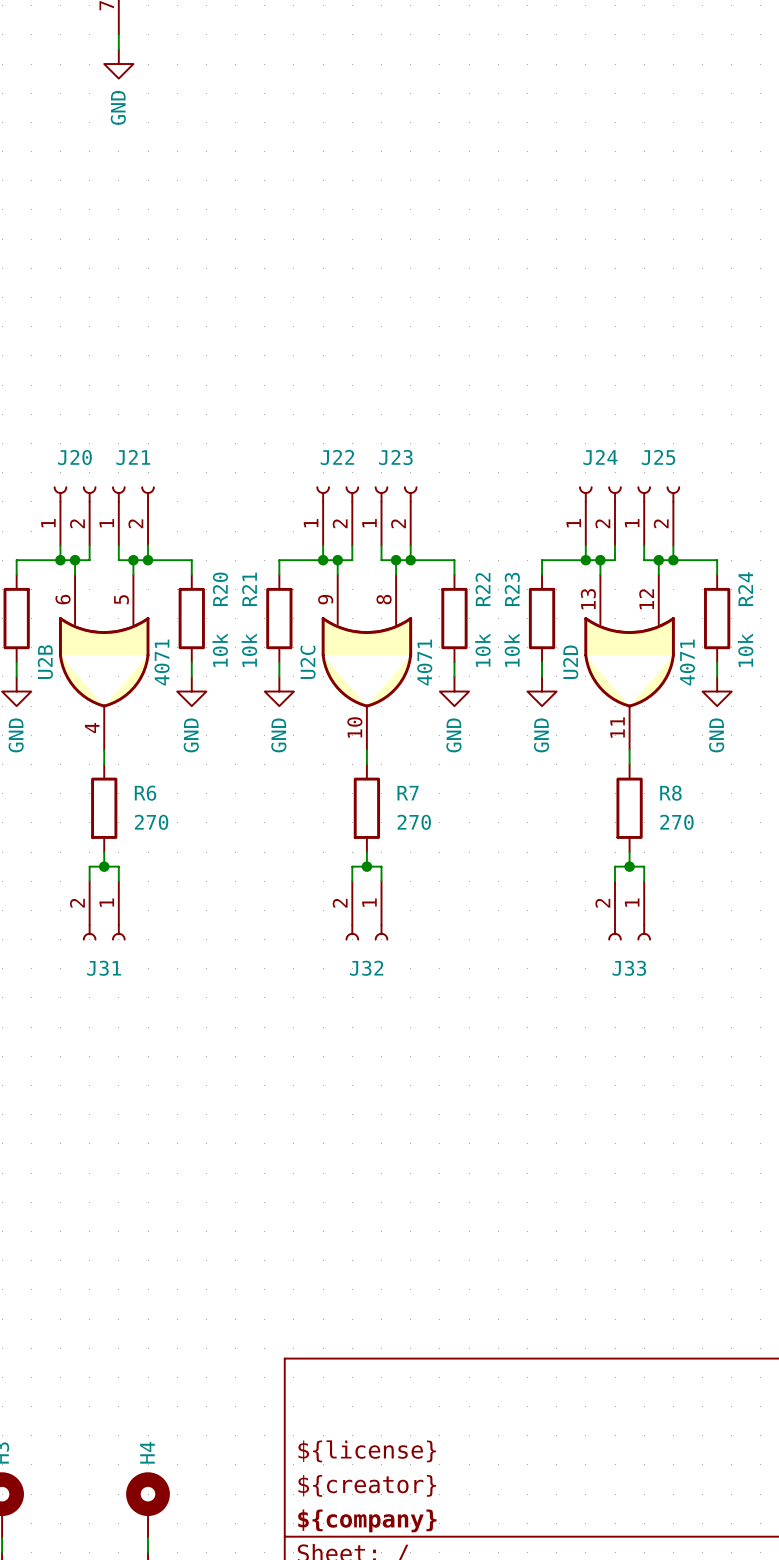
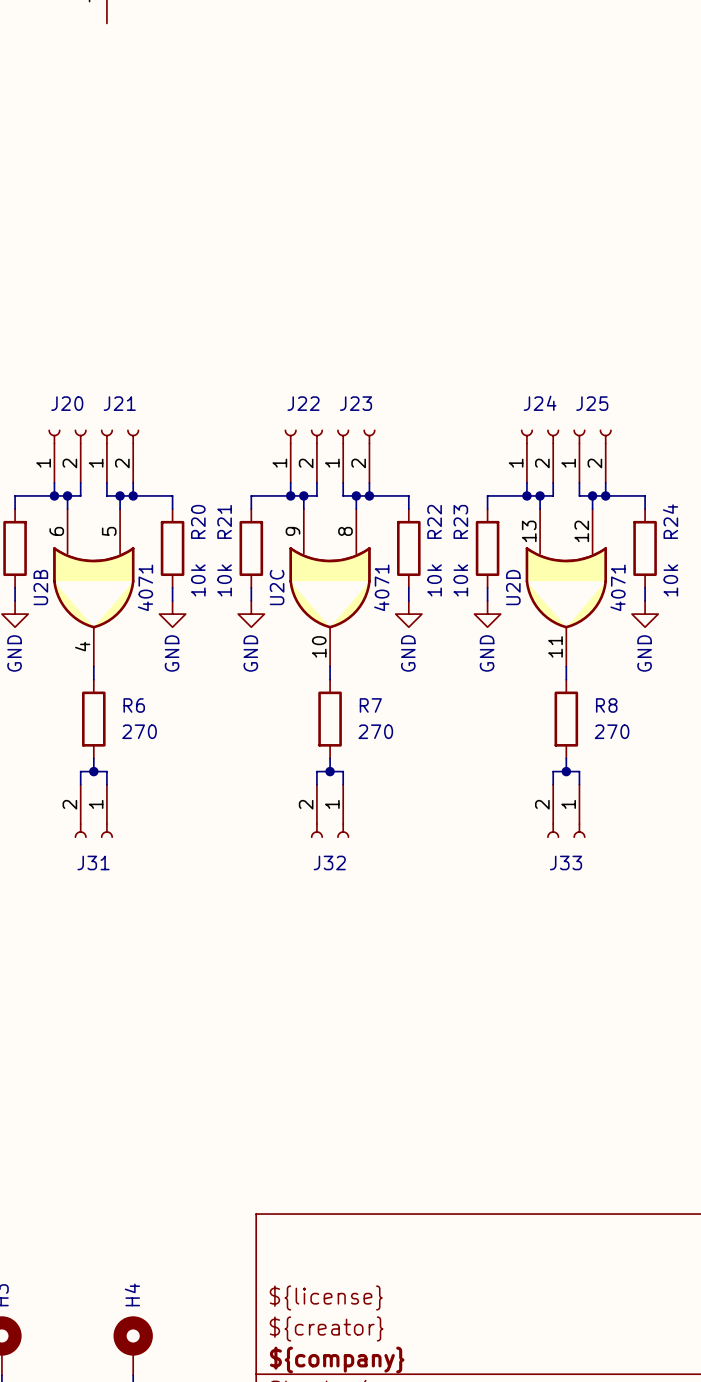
wire: (118, 34) (118, 49) -> none
power symbol: GND (118, 64) -> none

